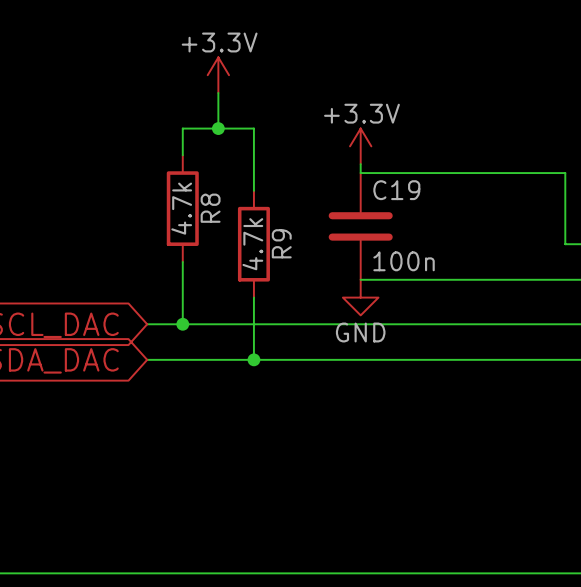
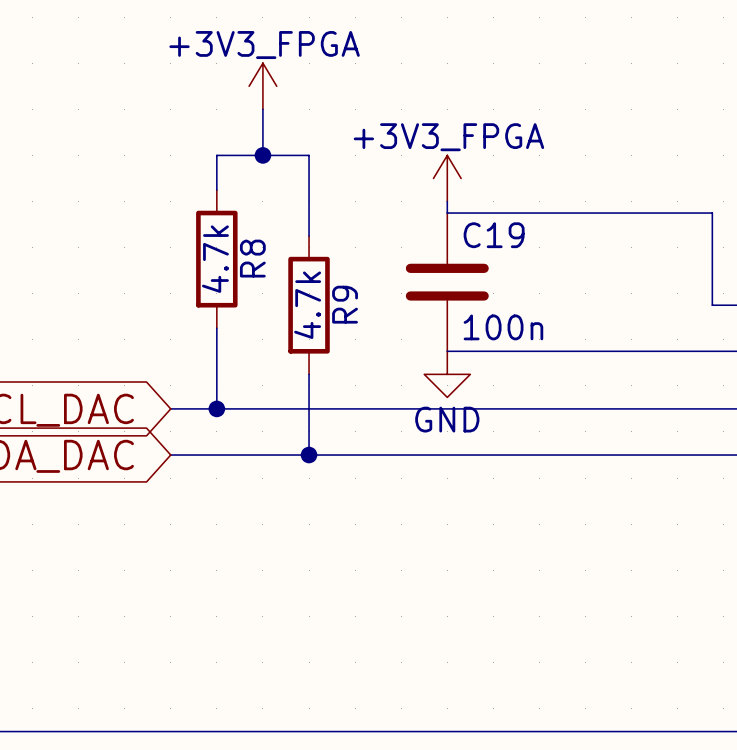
power symbol: +3.3V (218, 75) -> +3V3_FPGA (262, 86)
power symbol: +3.3V (360, 146) -> +3V3_FPGA (447, 178)

